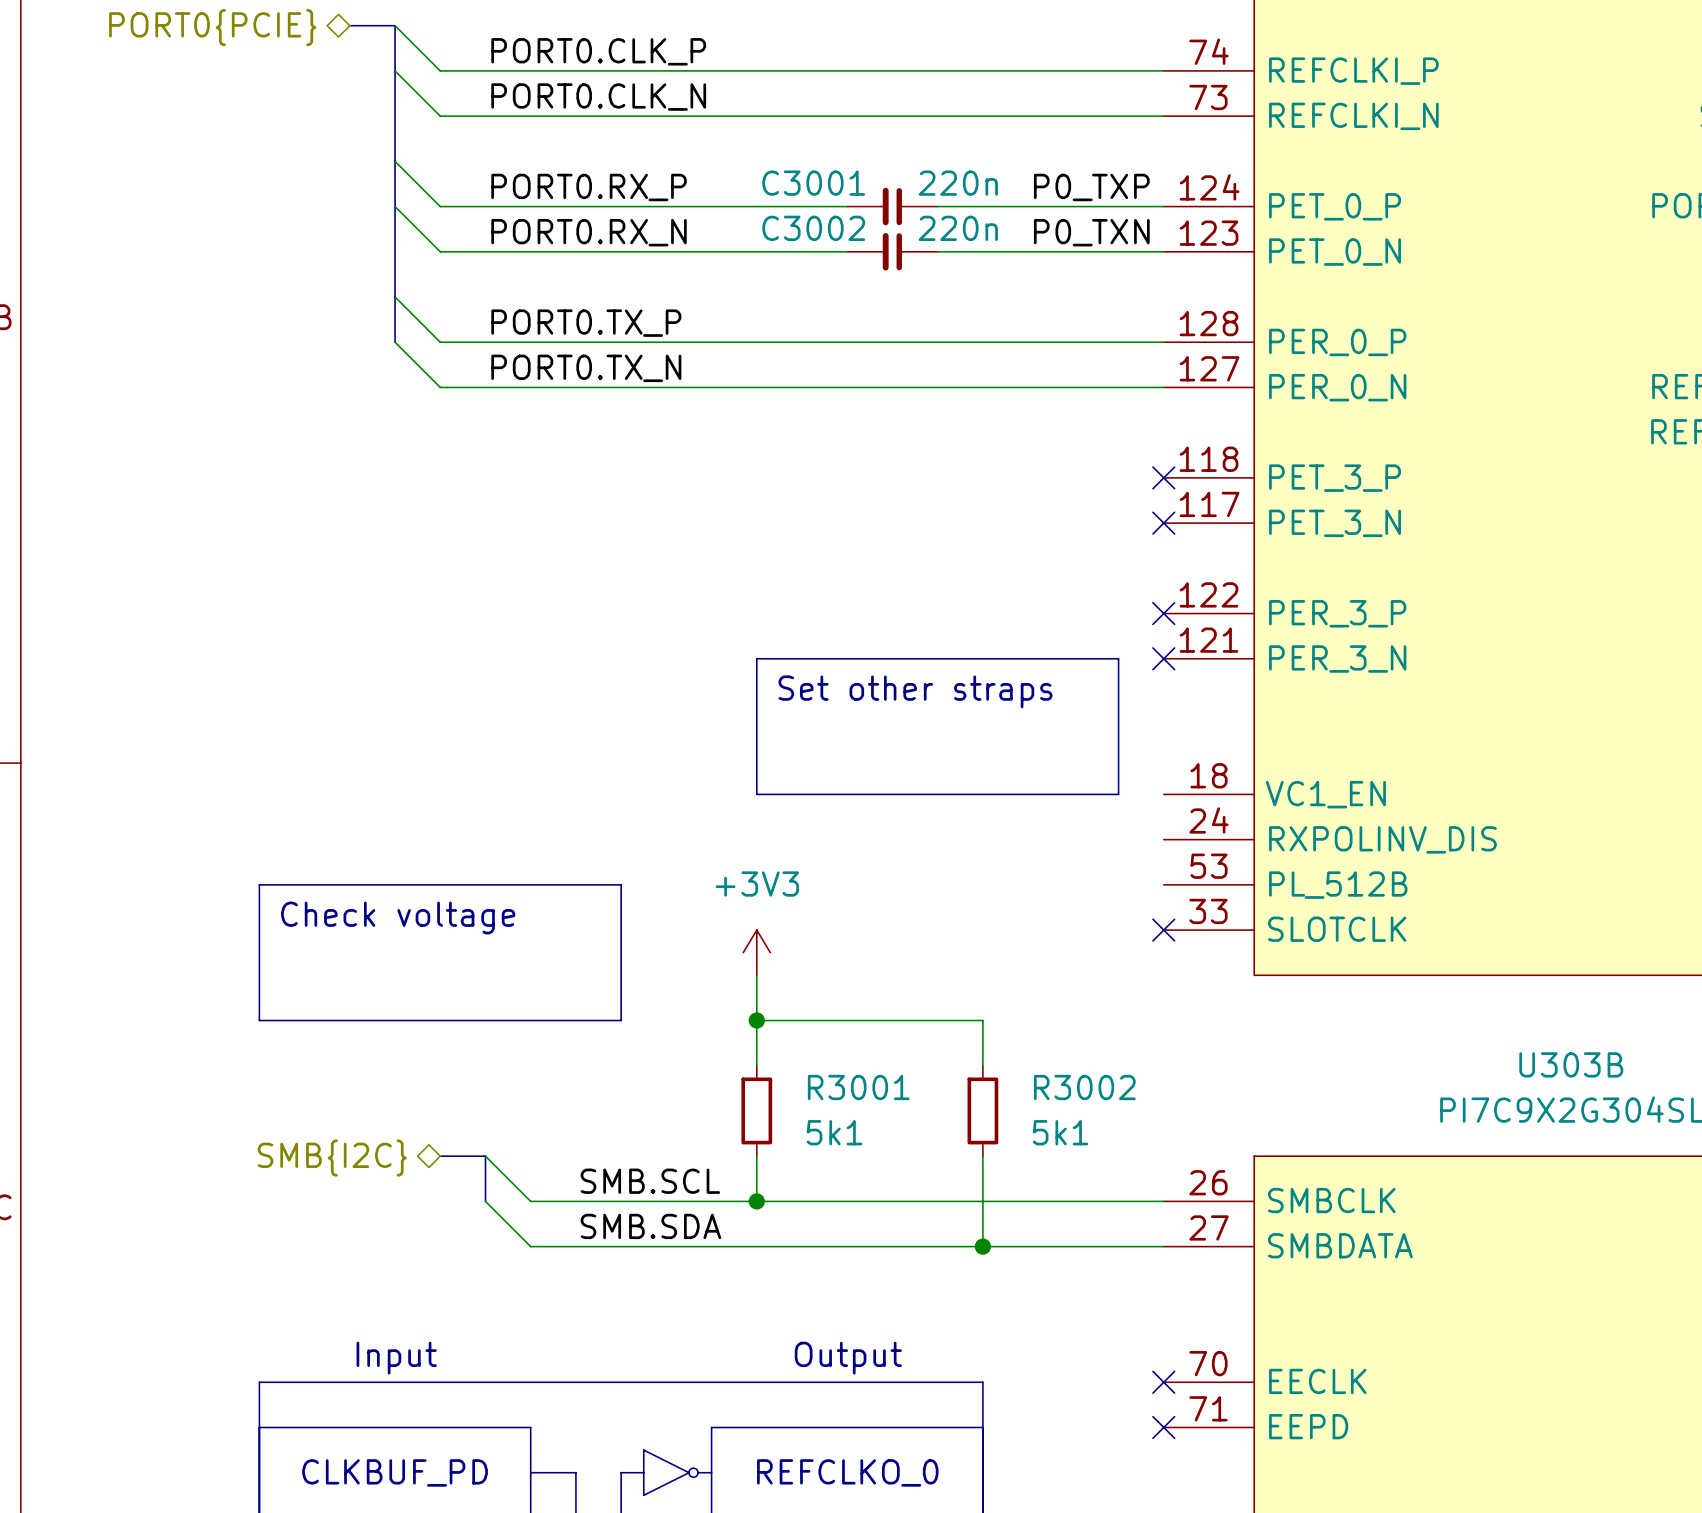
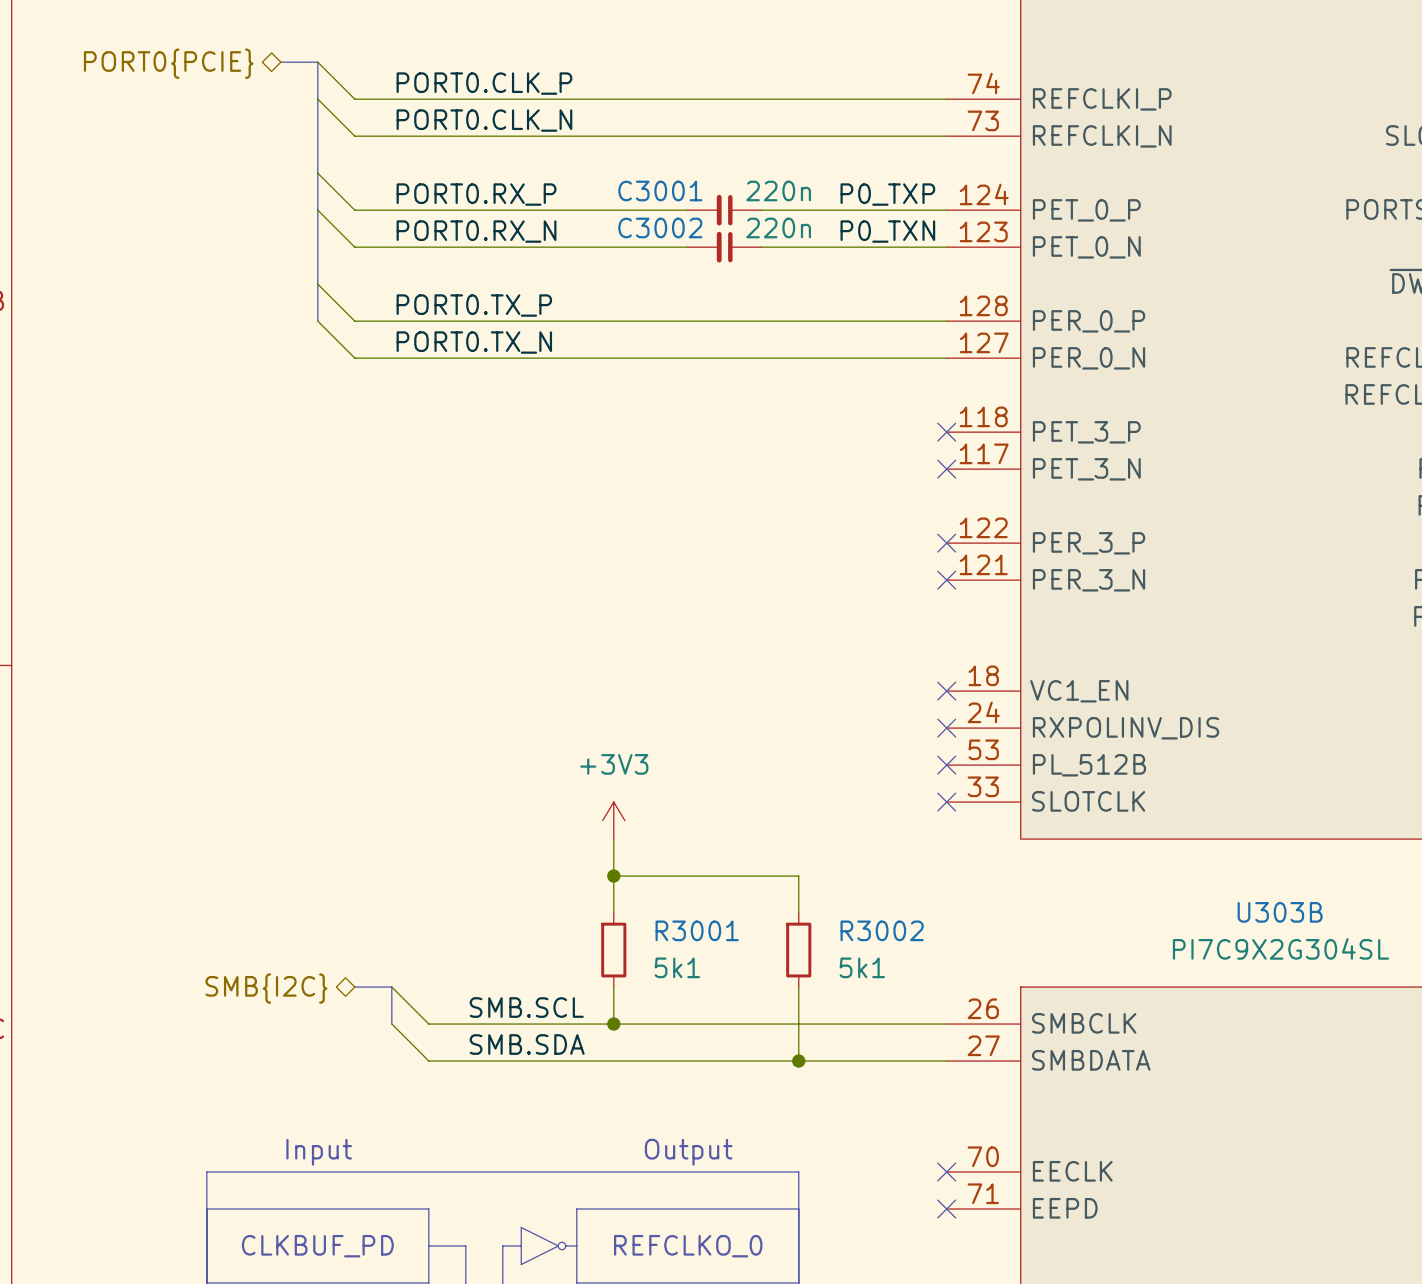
line: (756, 658) (1118, 658) (1118, 794) (756, 794) (756, 658) -> none
text: Set other straps (915, 691) -> none
no-connect mark: none -> (946, 691)
no-connect mark: none -> (946, 728)
line: (259, 884) (621, 884) (621, 1020) (259, 1020) (259, 884) -> none
no-connect mark: none -> (946, 765)
text: Check voltage (398, 917) -> none

